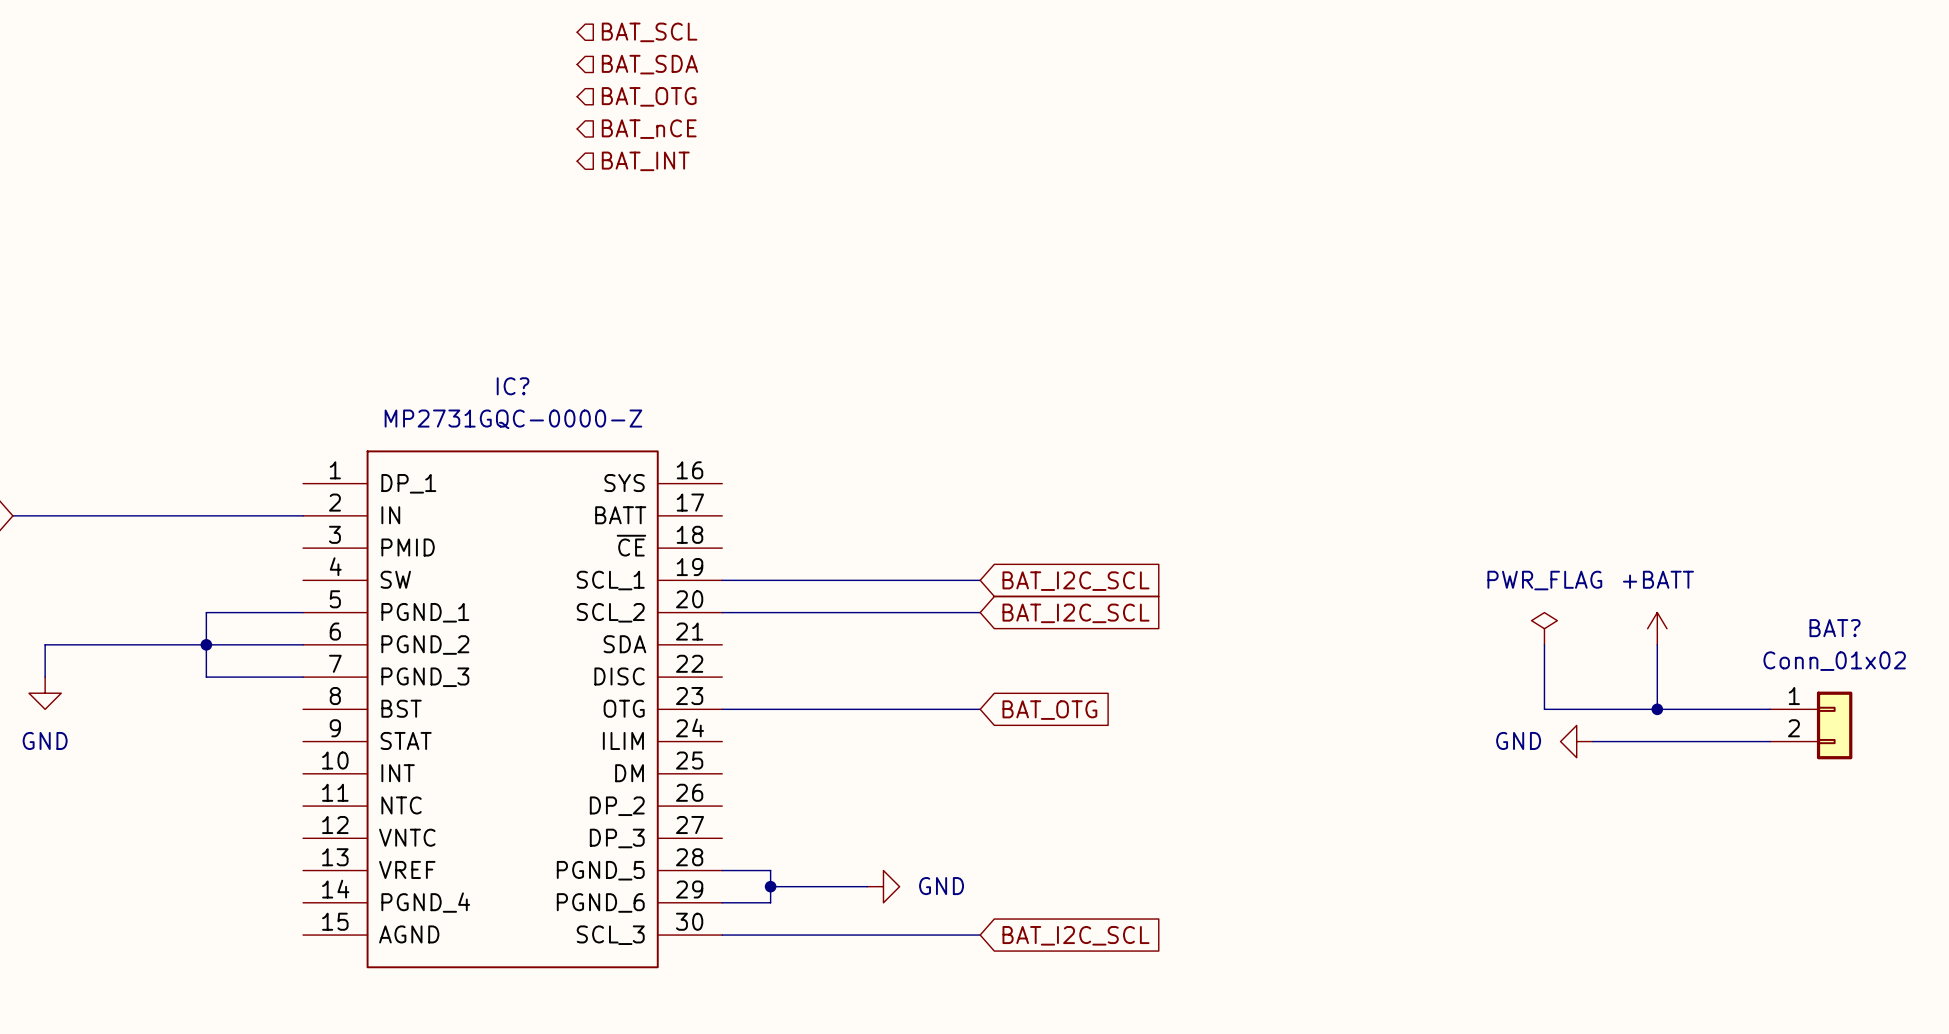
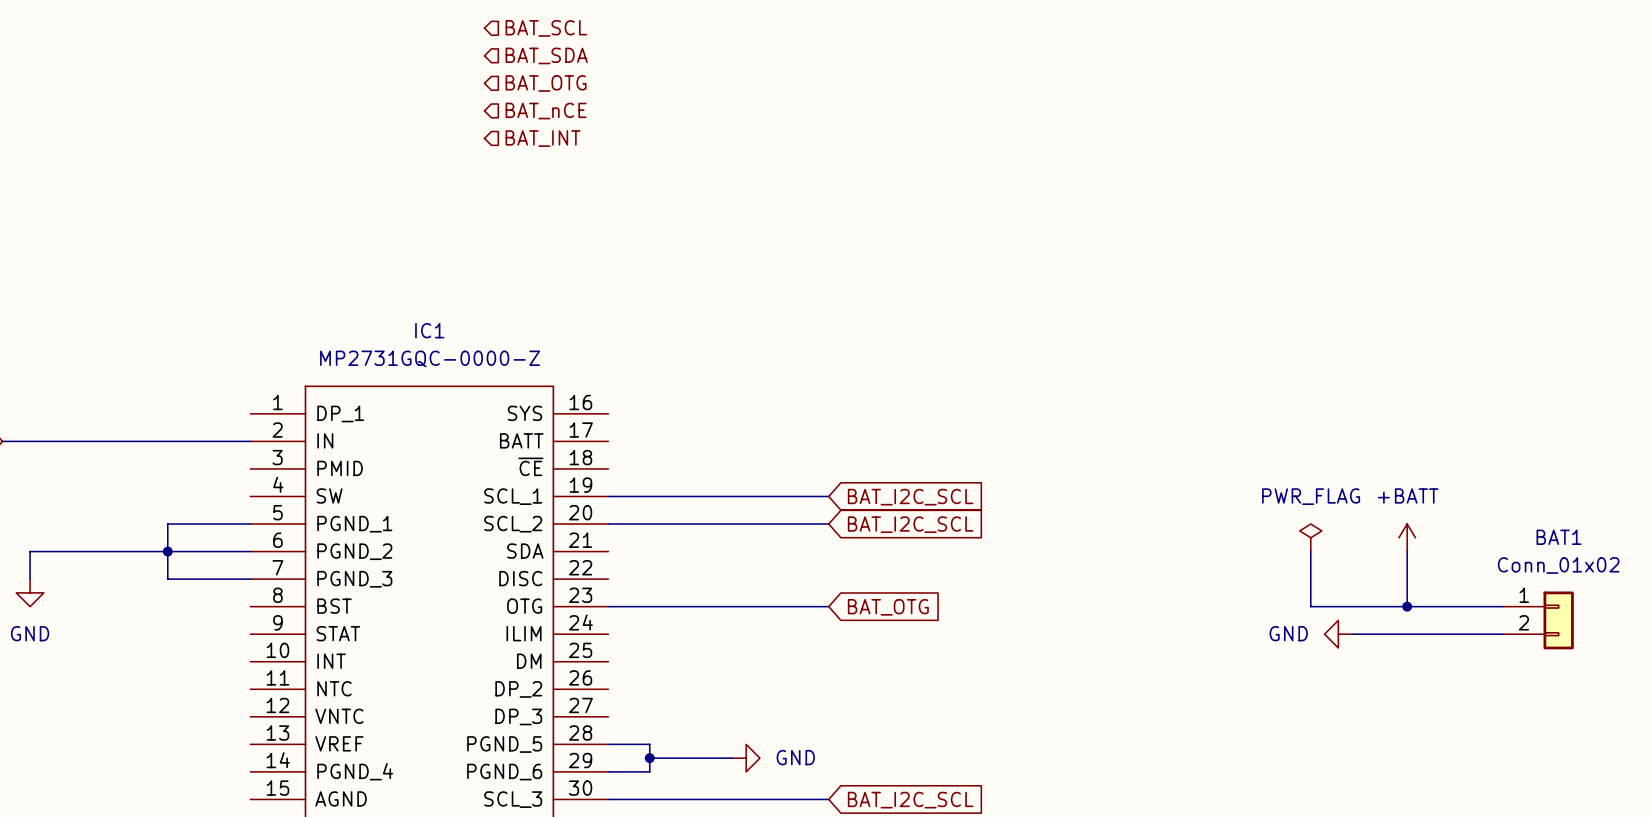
IC? name: IC? (513, 386) -> IC1 (429, 330)
BAT? name: BAT? (1835, 628) -> BAT1 (1558, 537)

